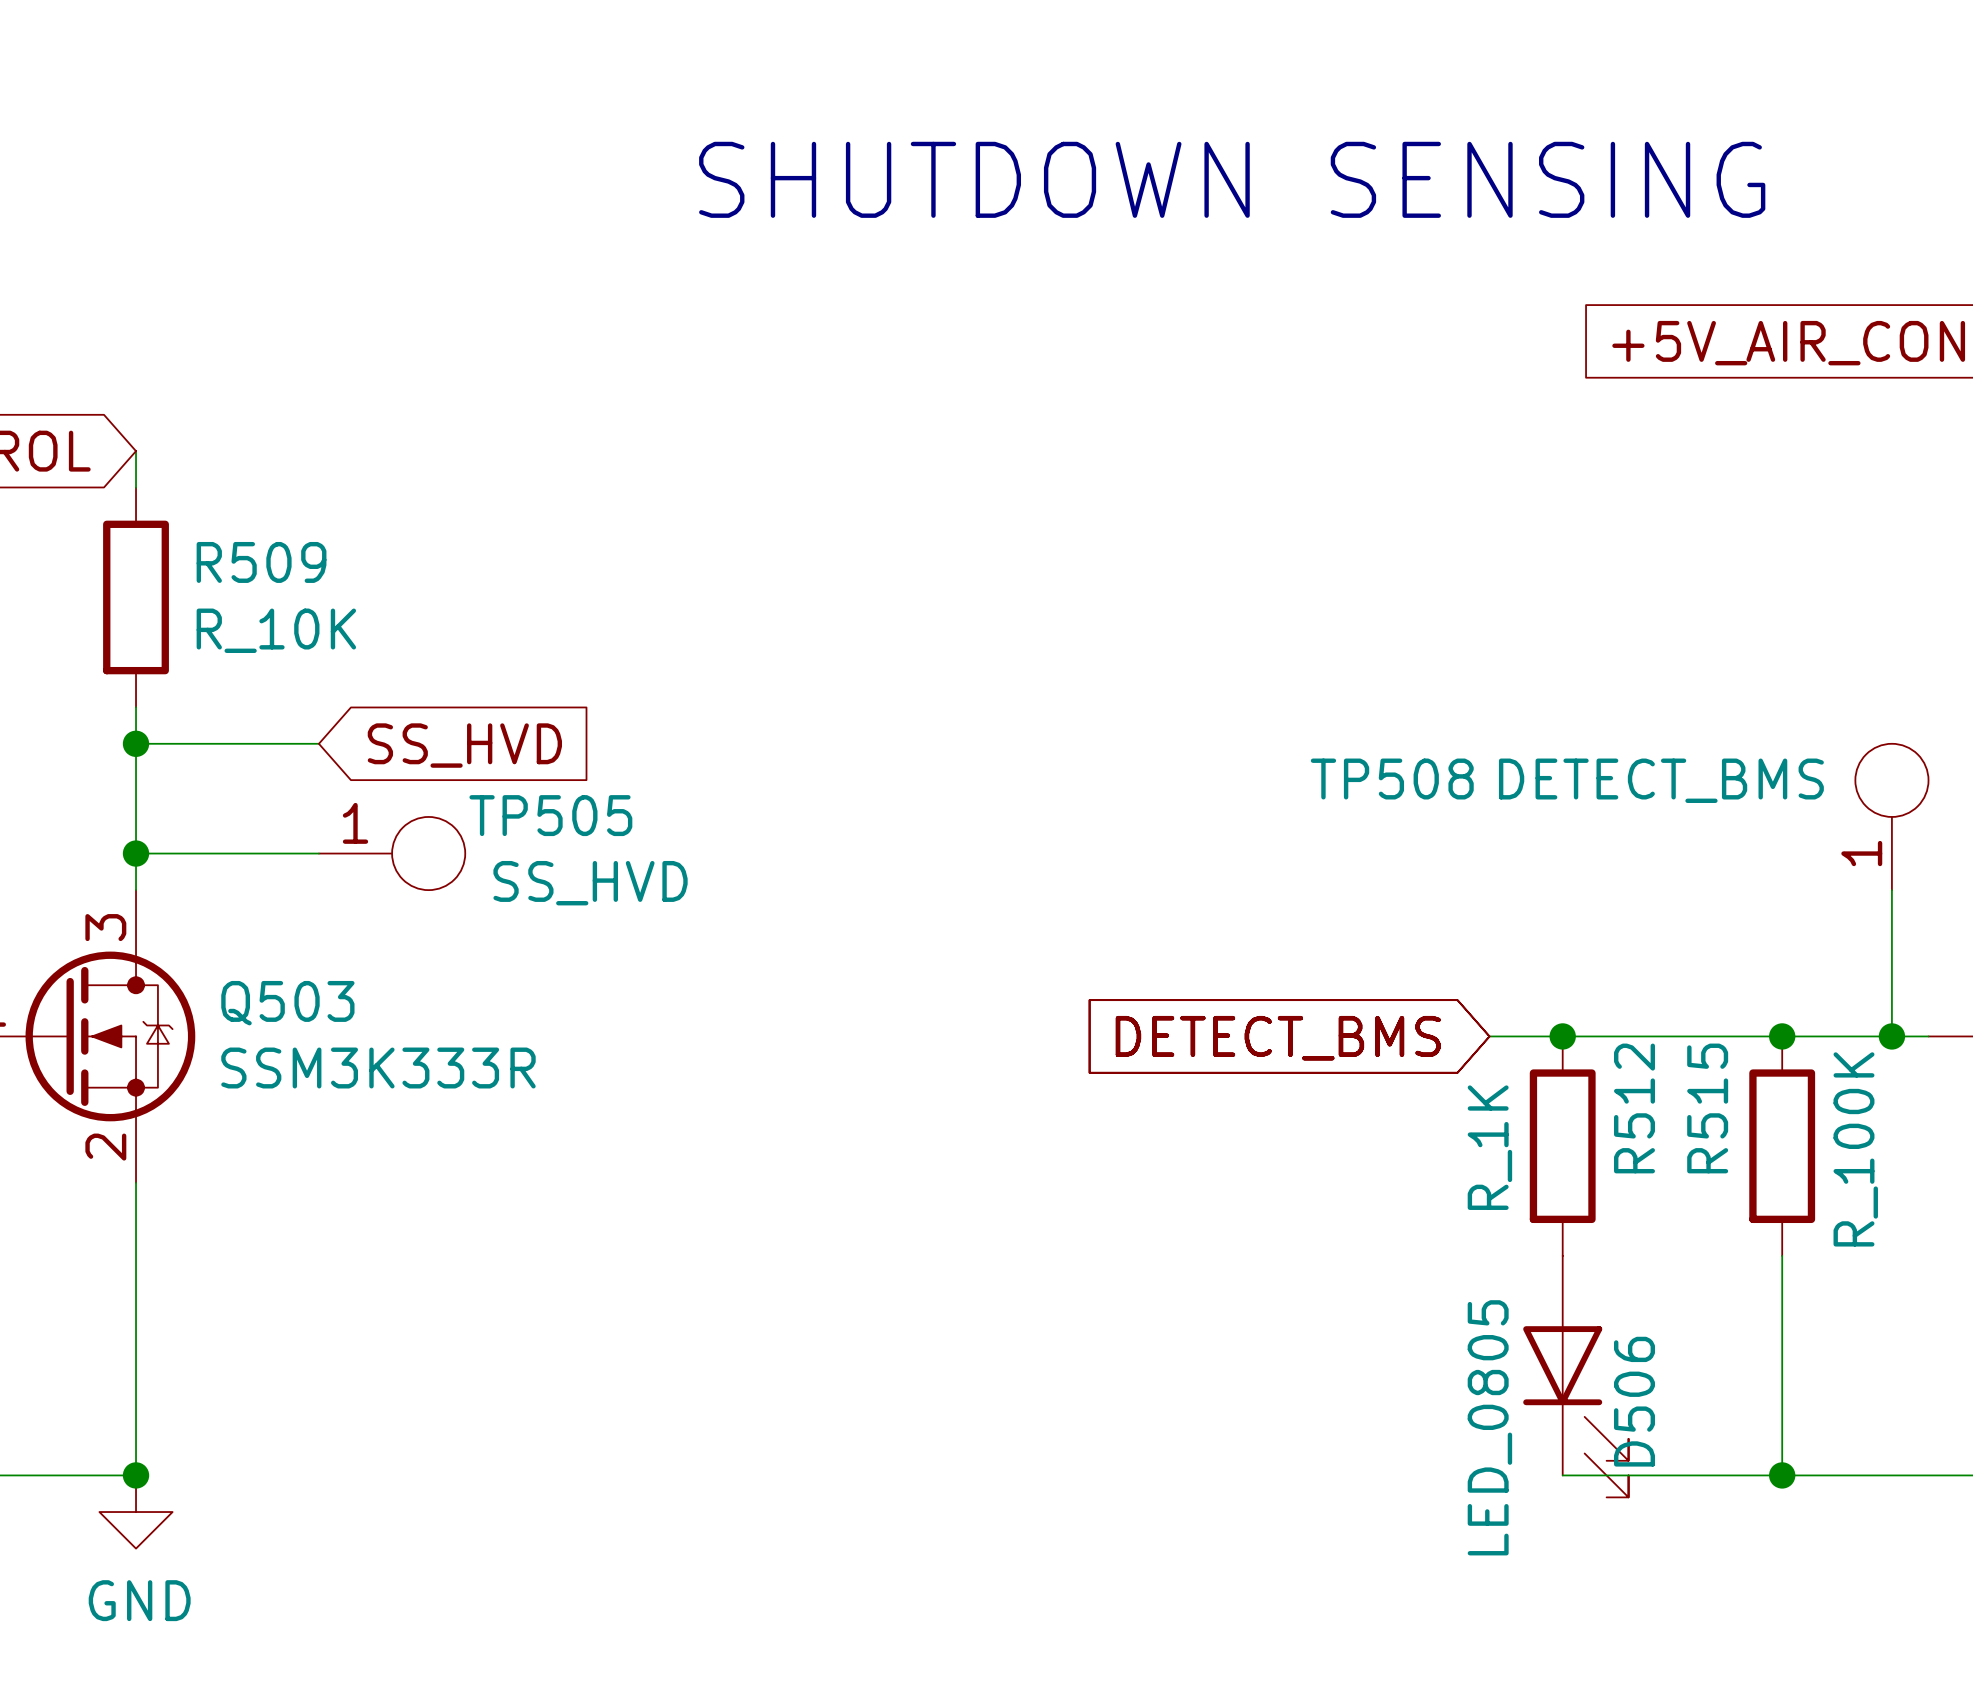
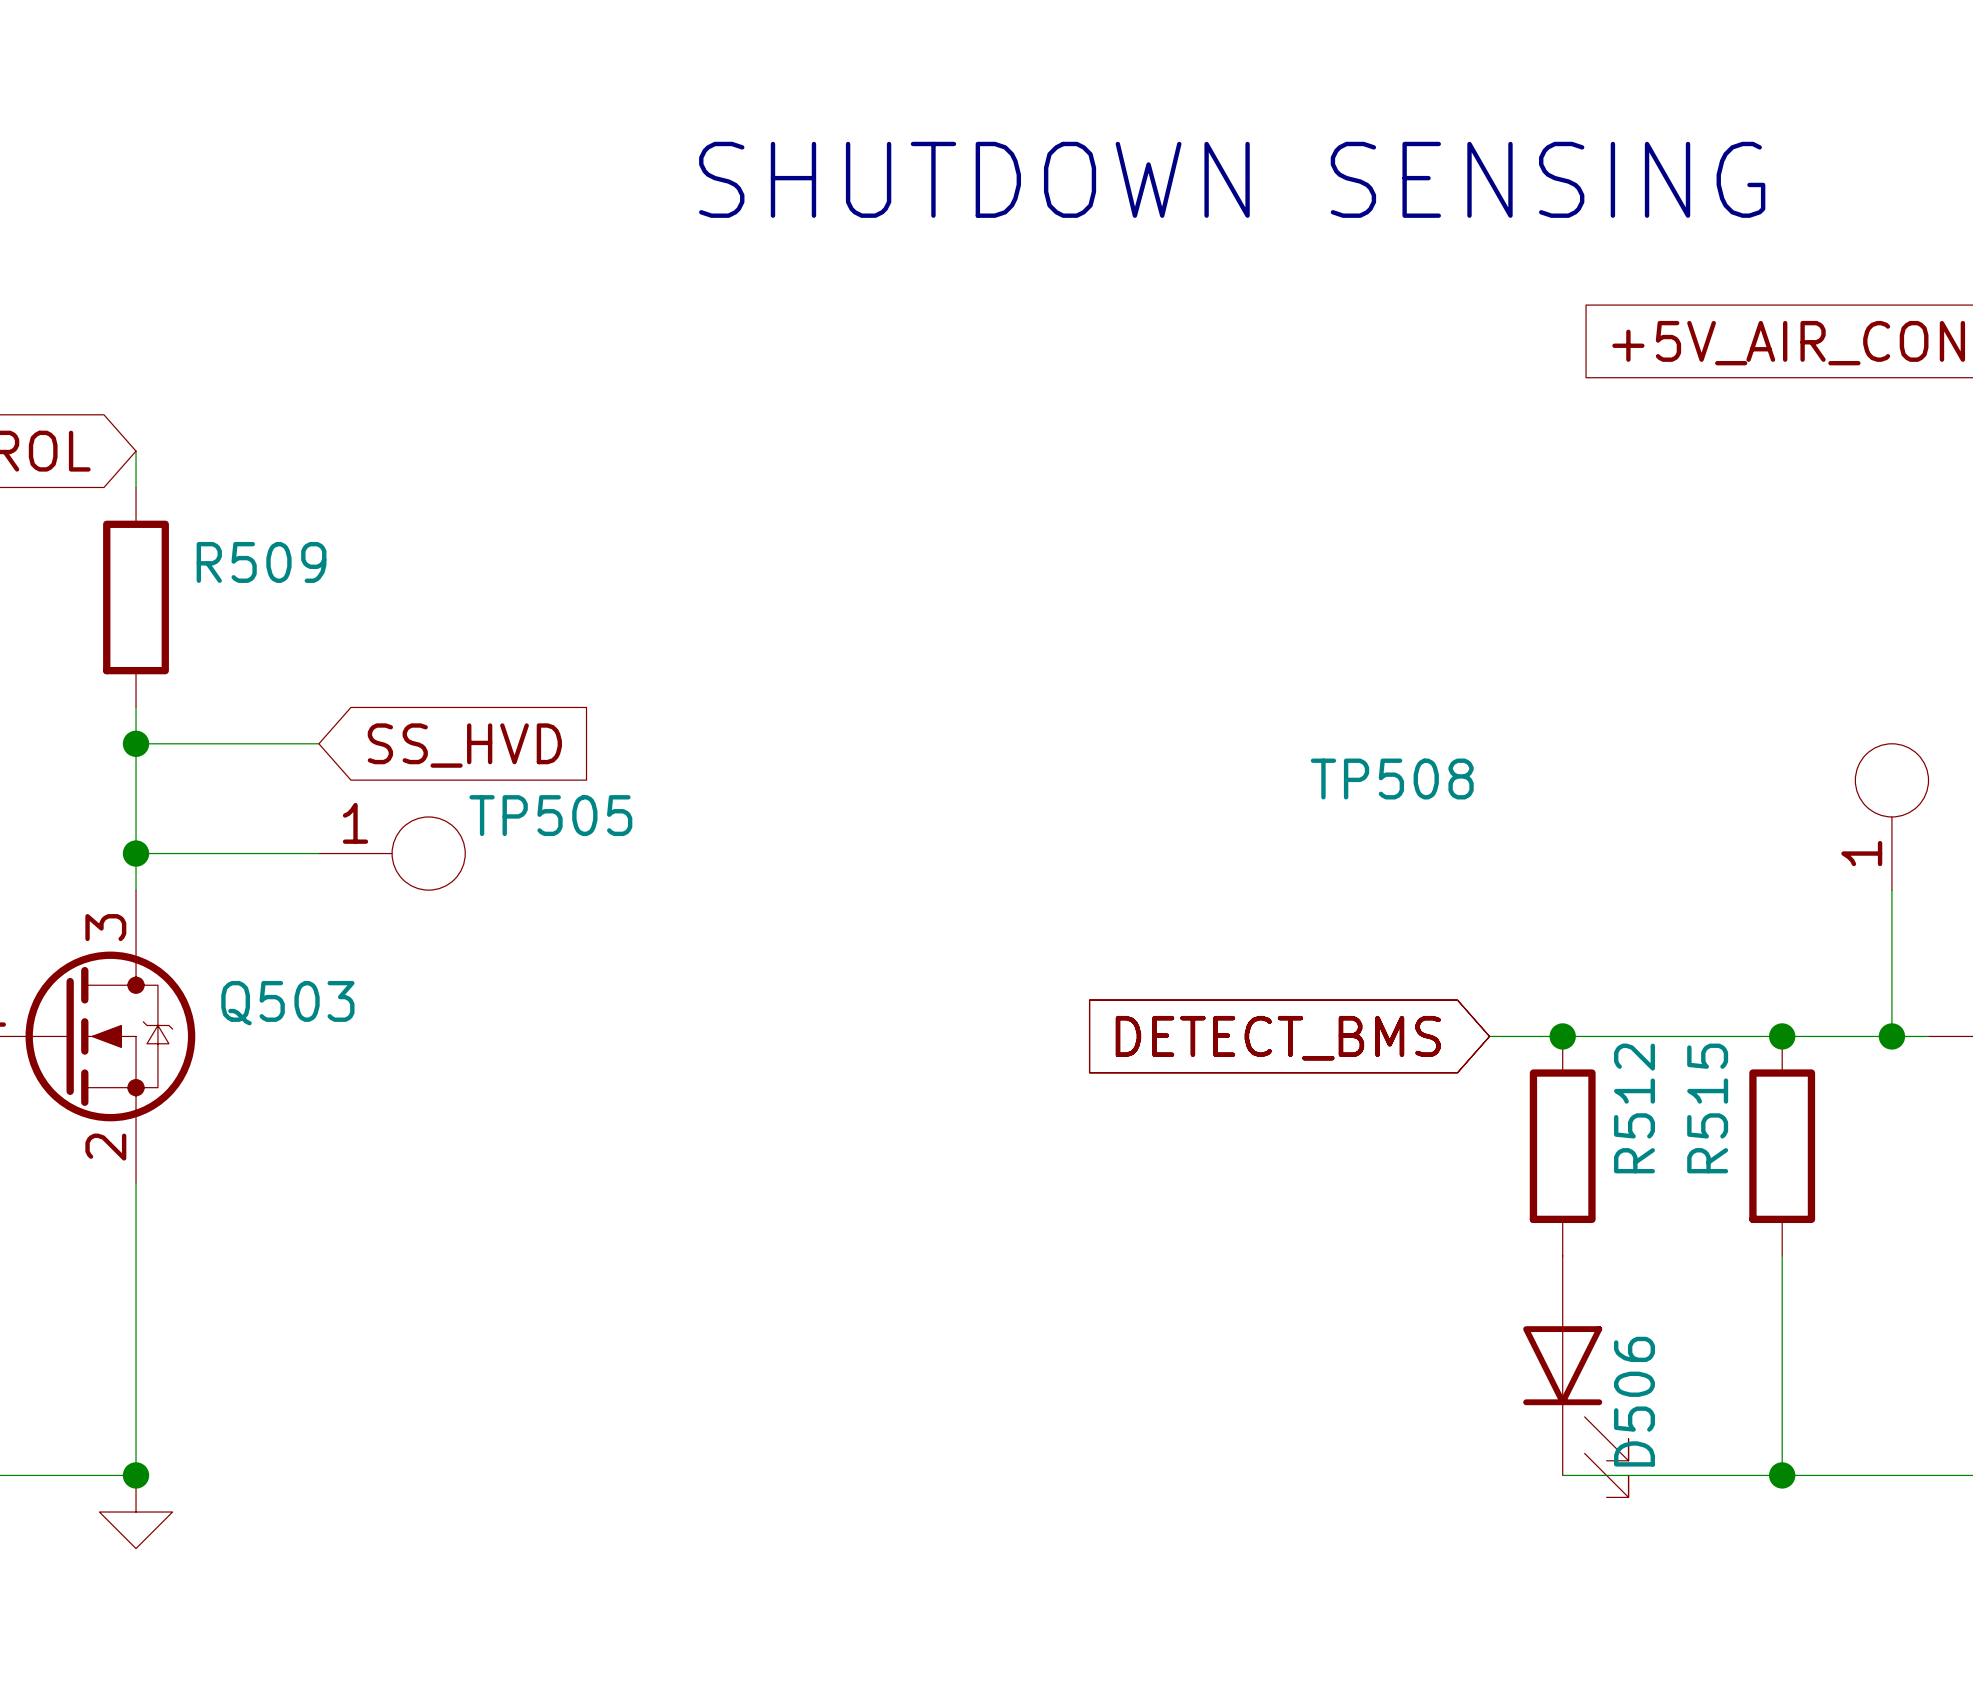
R509 value: R_10K (276, 630) -> none
TP508 value: DETECT_BMS (1661, 780) -> none
TP505 value: SS_HVD (590, 883) -> none
Q503 value: SSM3K333R (378, 1068) -> none
R512 value: R_1K (1489, 1147) -> none
R515 value: R_100K (1855, 1149) -> none
D506 value: LED_0805 (1489, 1427) -> none
power symbol text: GND (139, 1600) -> none

